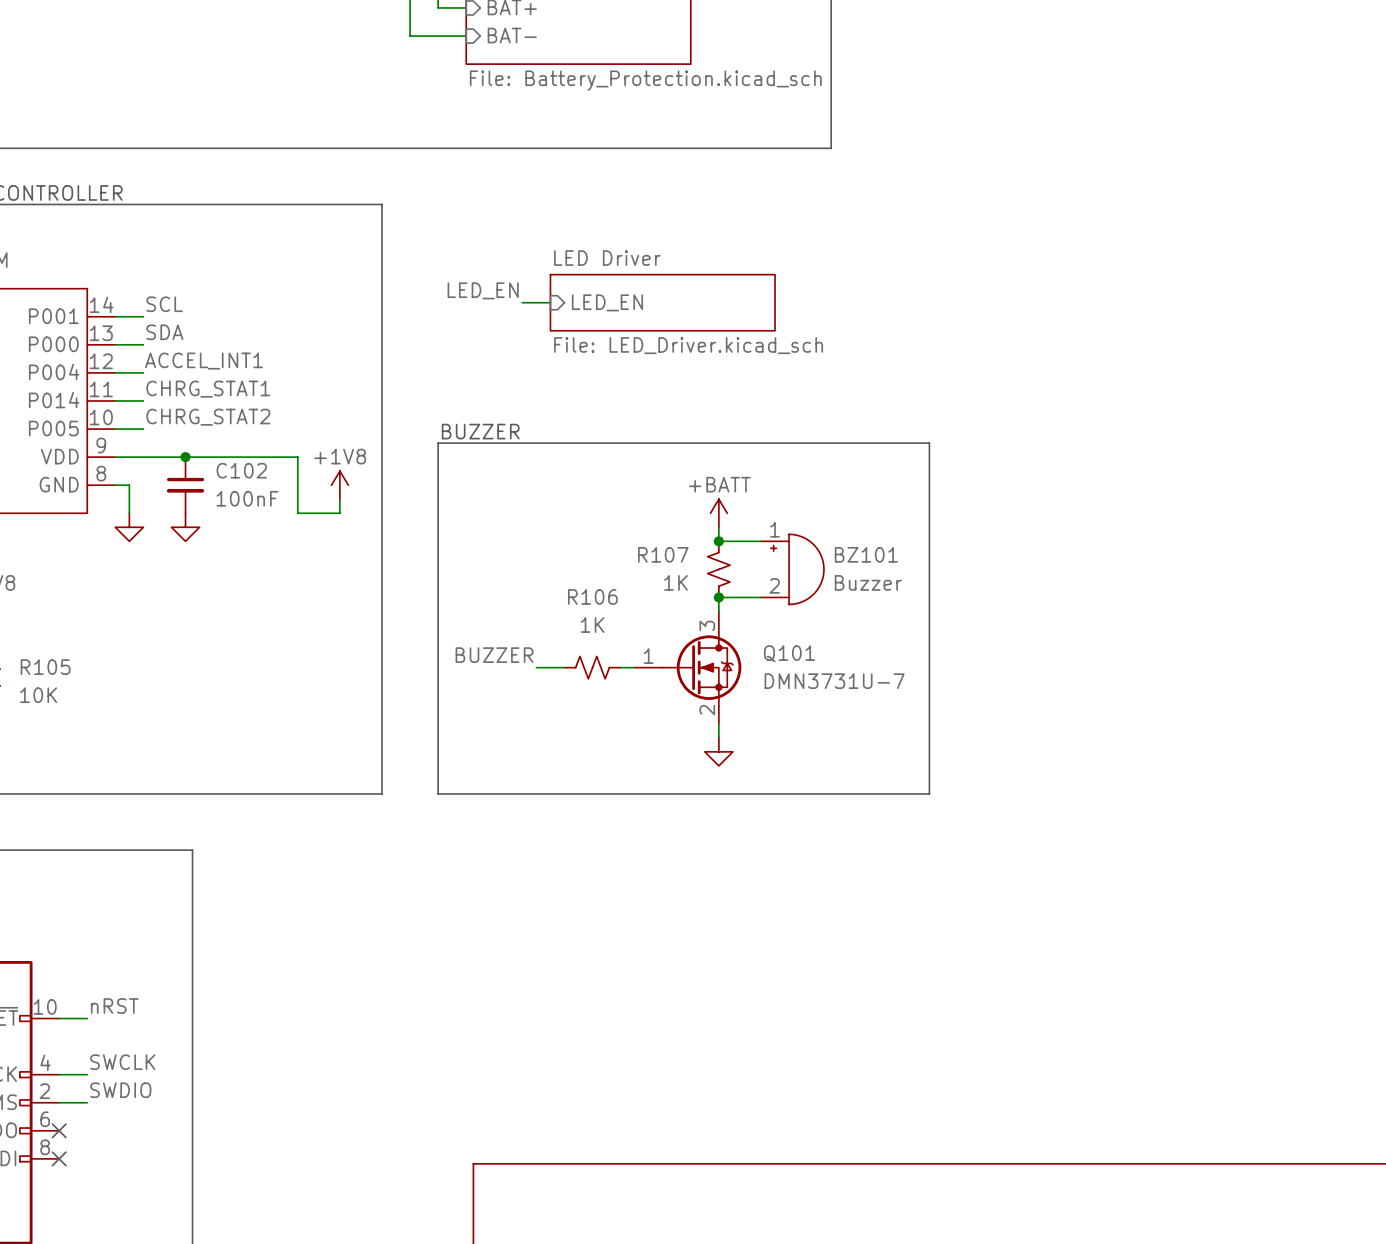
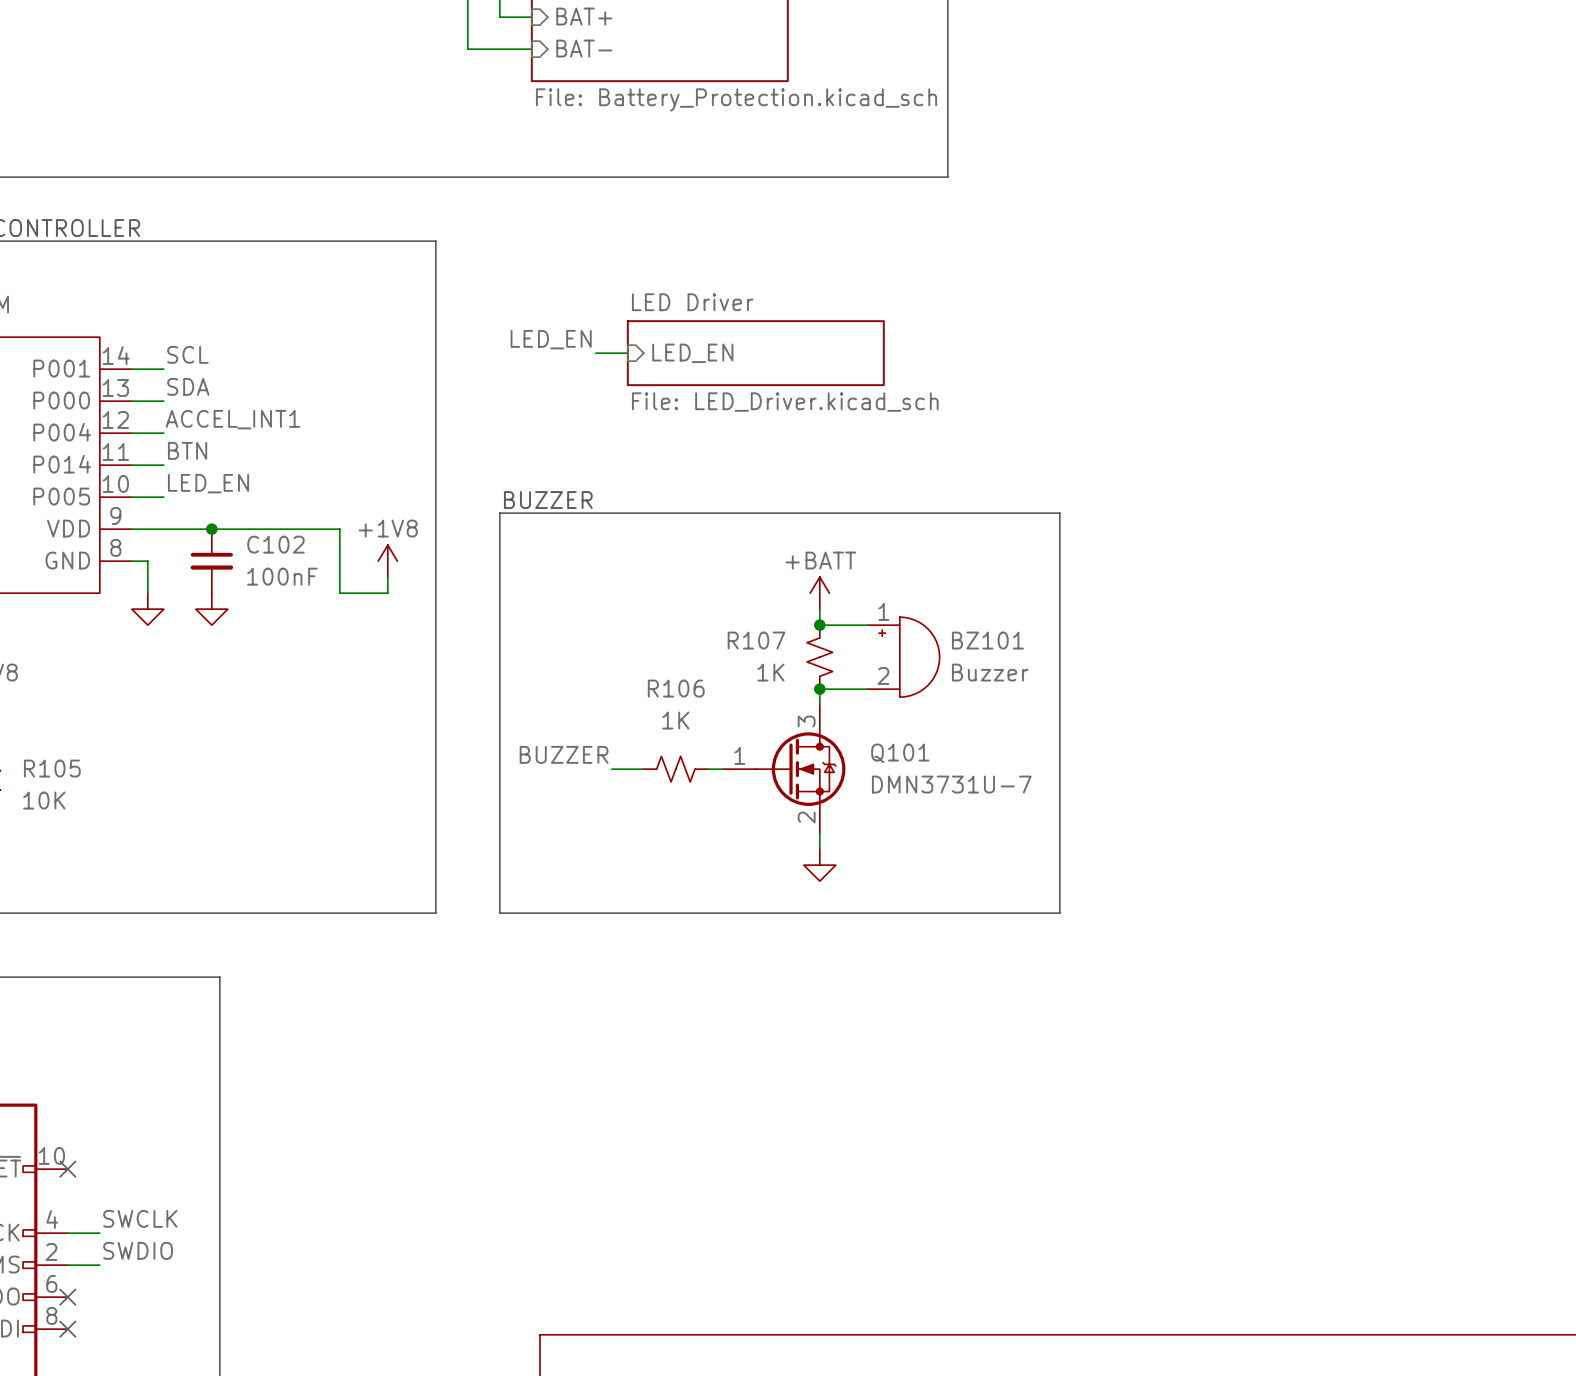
label: CHRG_STAT1 (208, 389) -> BTN (187, 450)
label: CHRG_STAT2 (208, 417) -> LED_EN (208, 483)
label: nRST (114, 1006) -> none
wire: (59, 1018) (87, 1018) -> none
no-connect mark: none -> (67, 1169)

